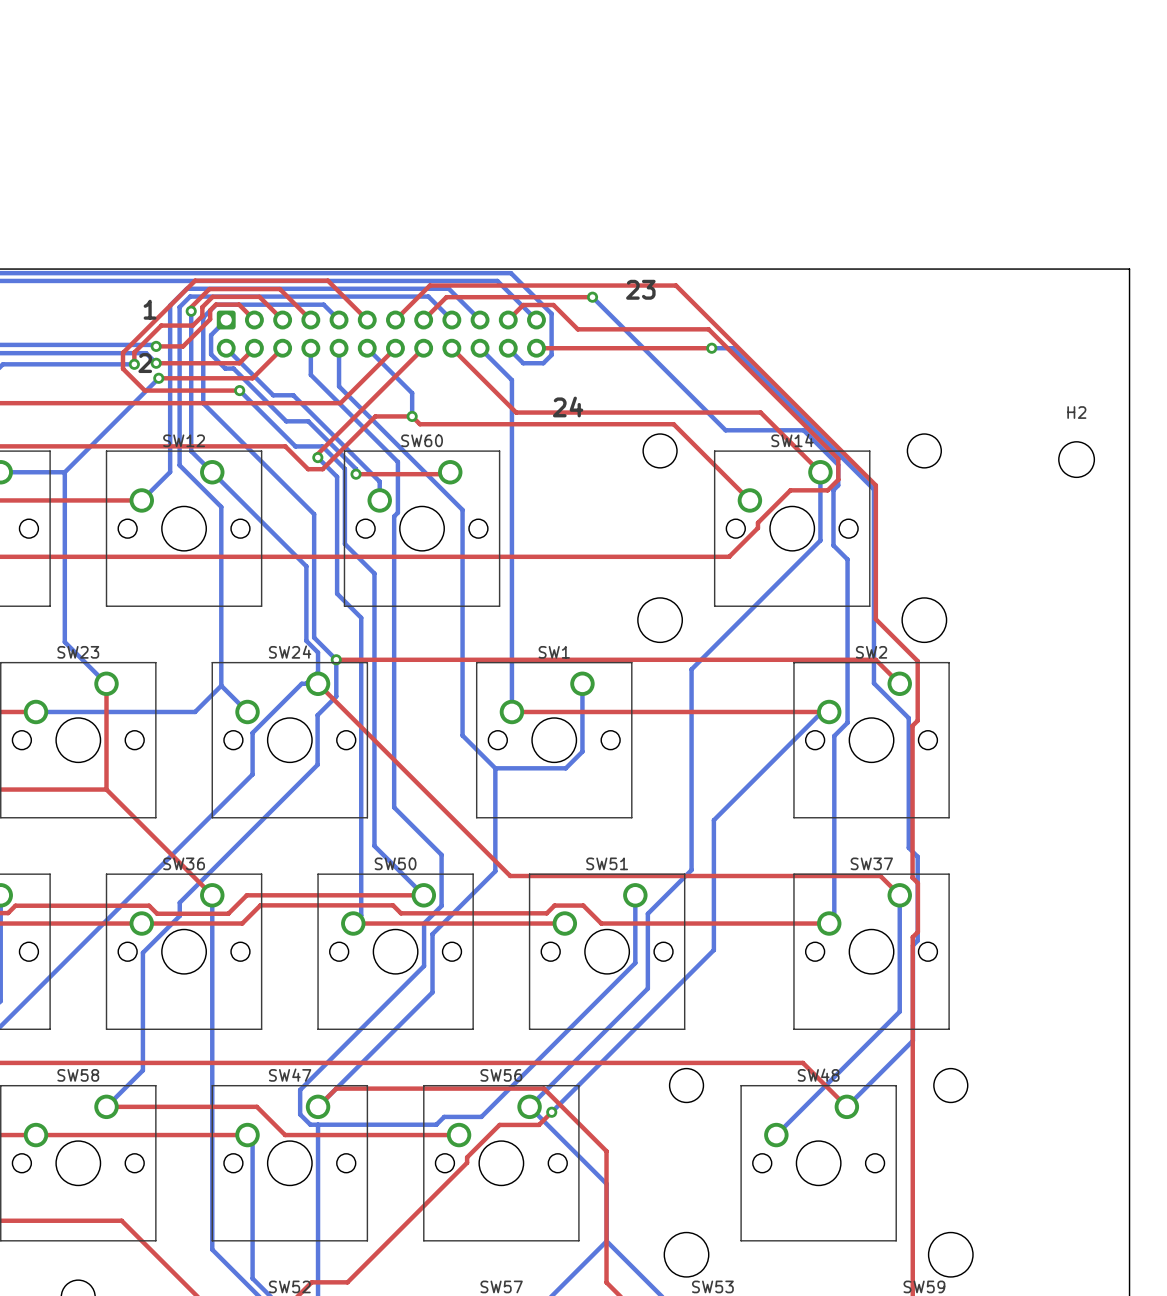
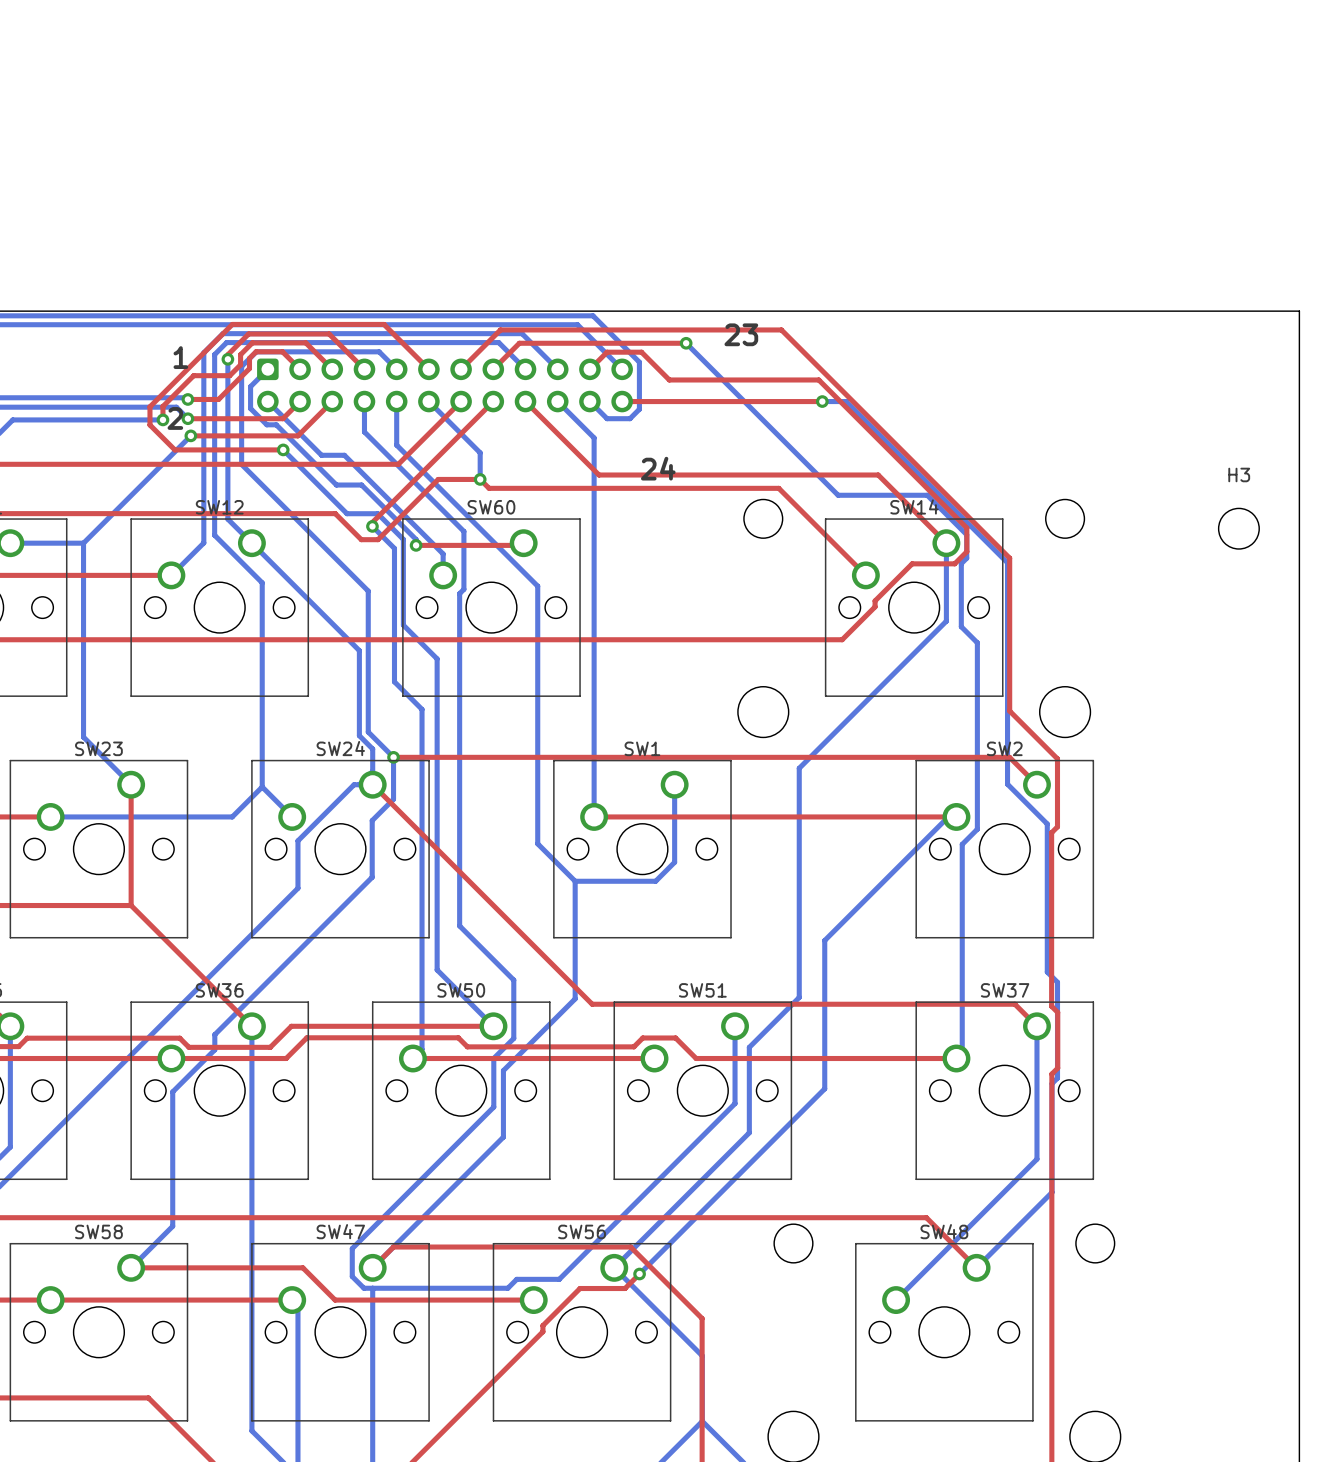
H2 name: H2 (1076, 412) -> H3 (1239, 474)

